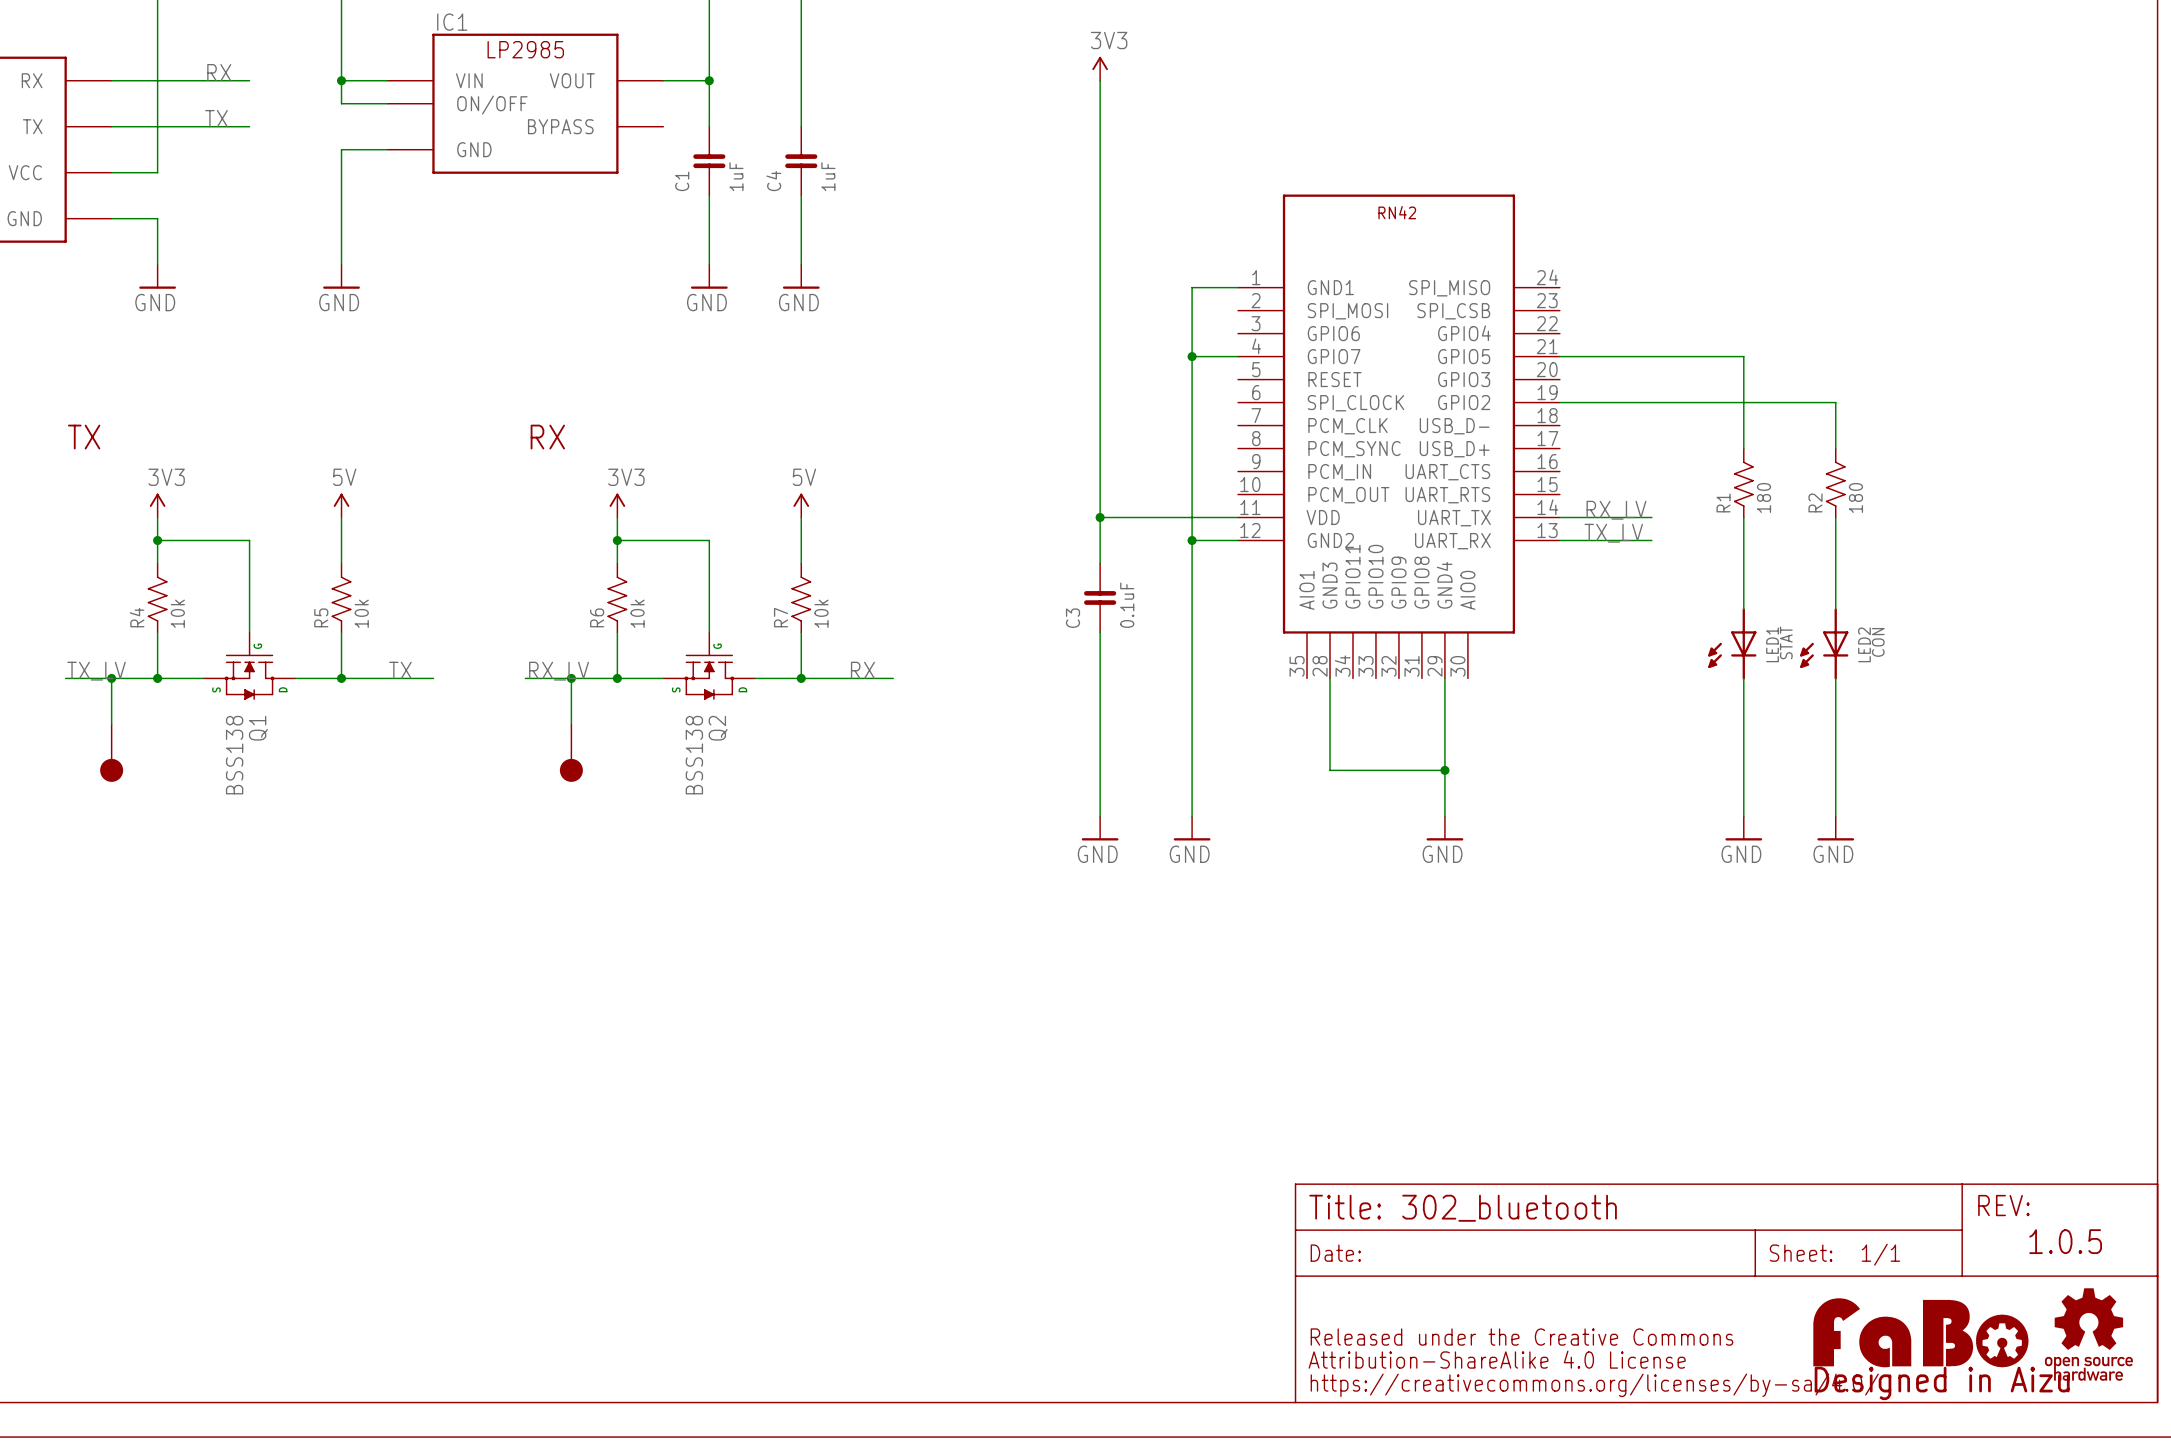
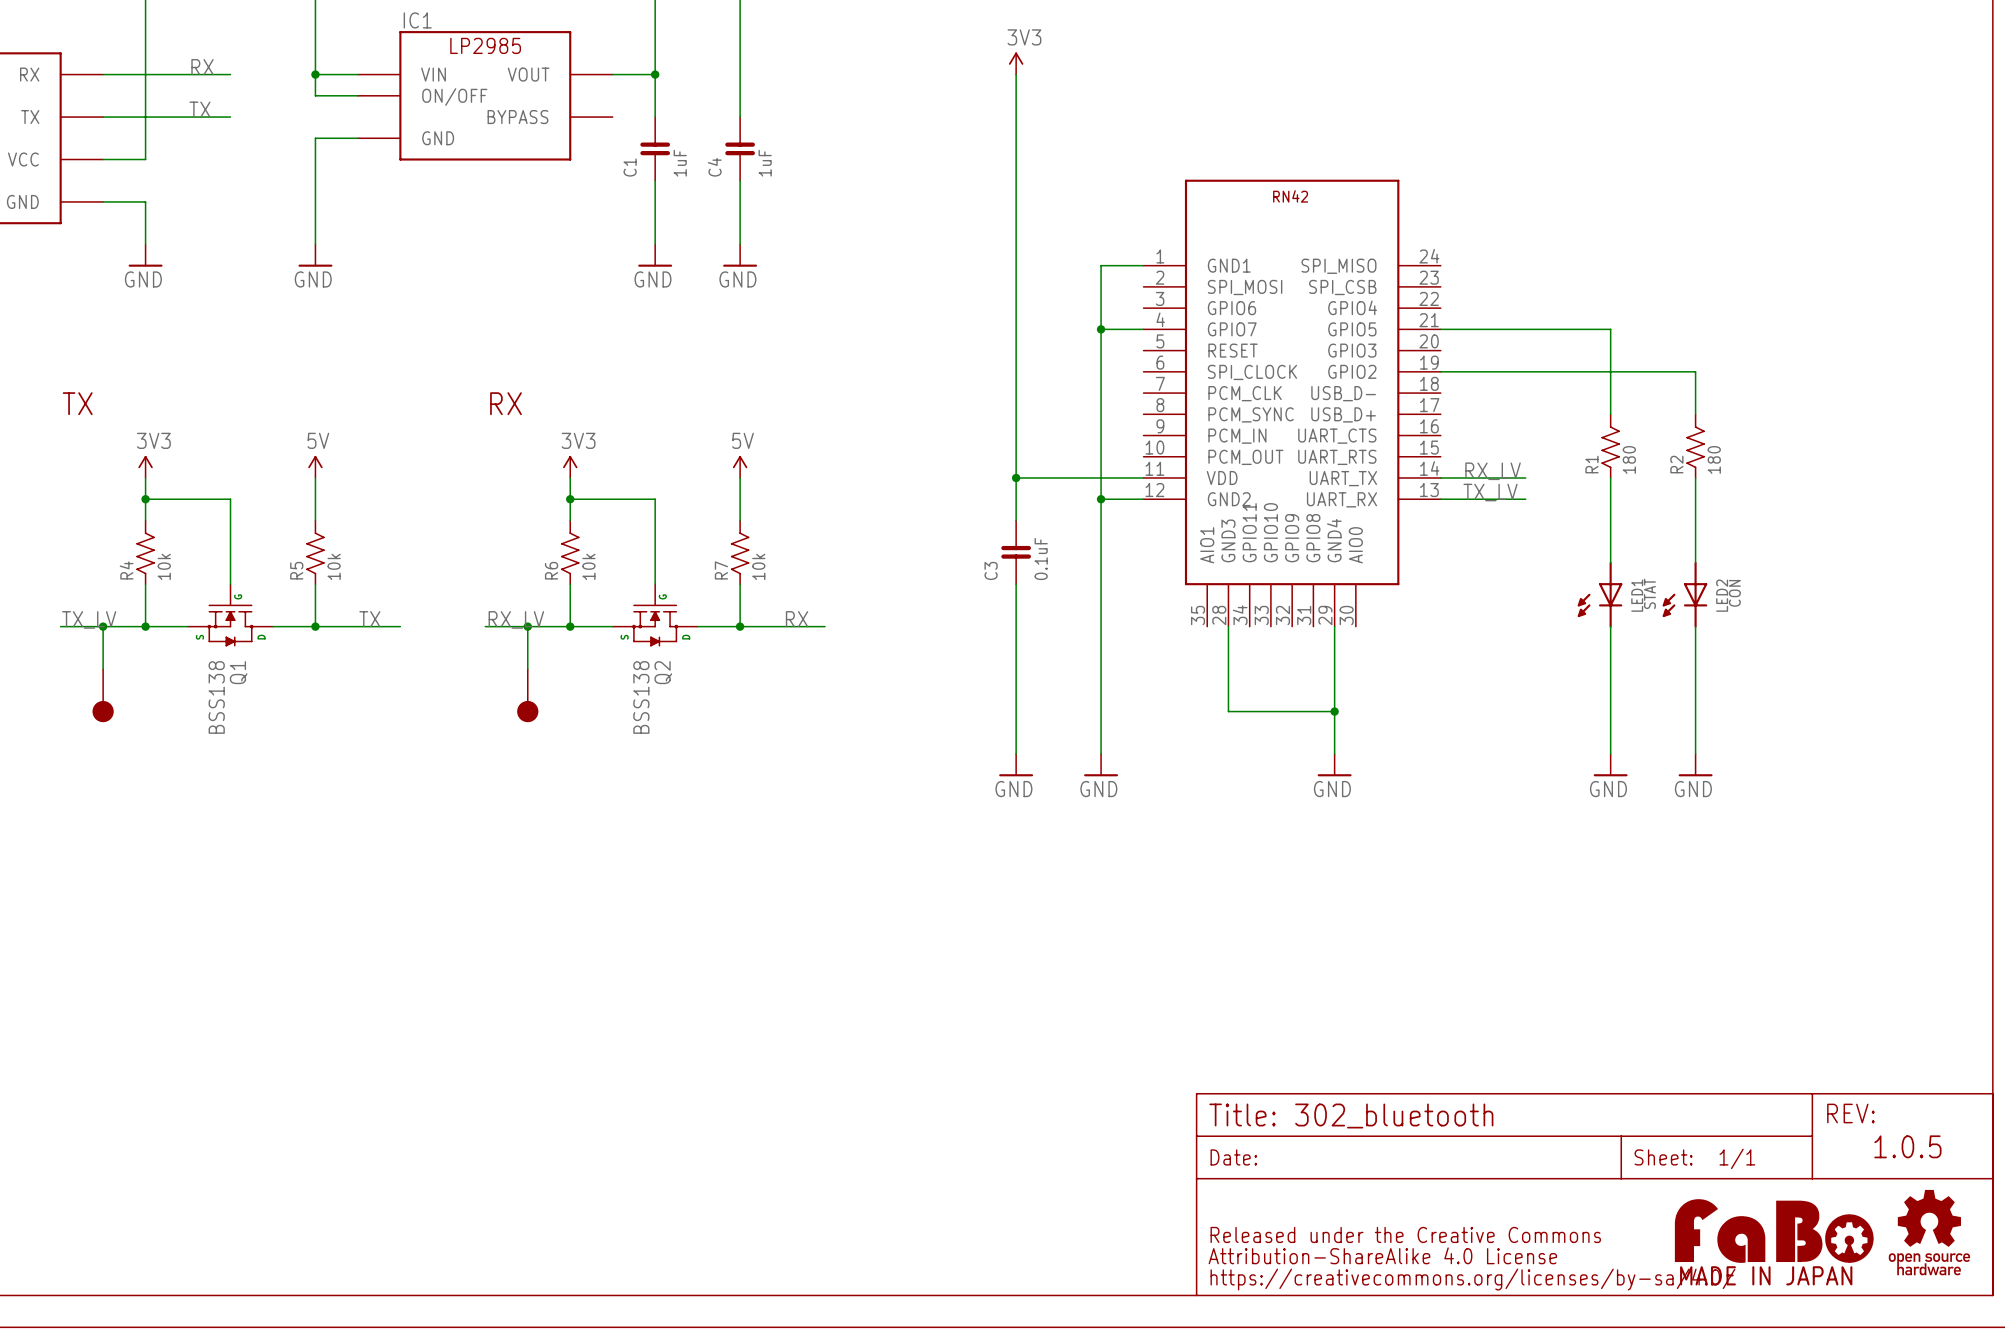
part text: none -> MADE IN JAPAN (1766, 1275)
part text: Designed in Aizu (1942, 1383) -> none

